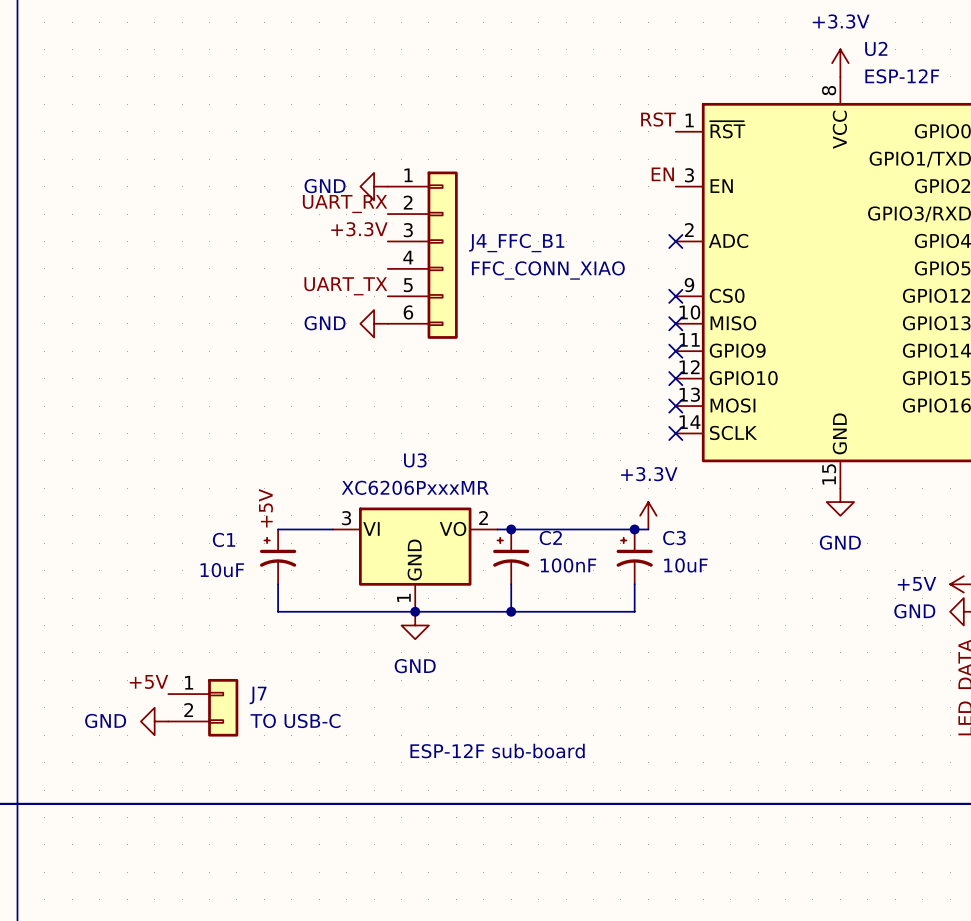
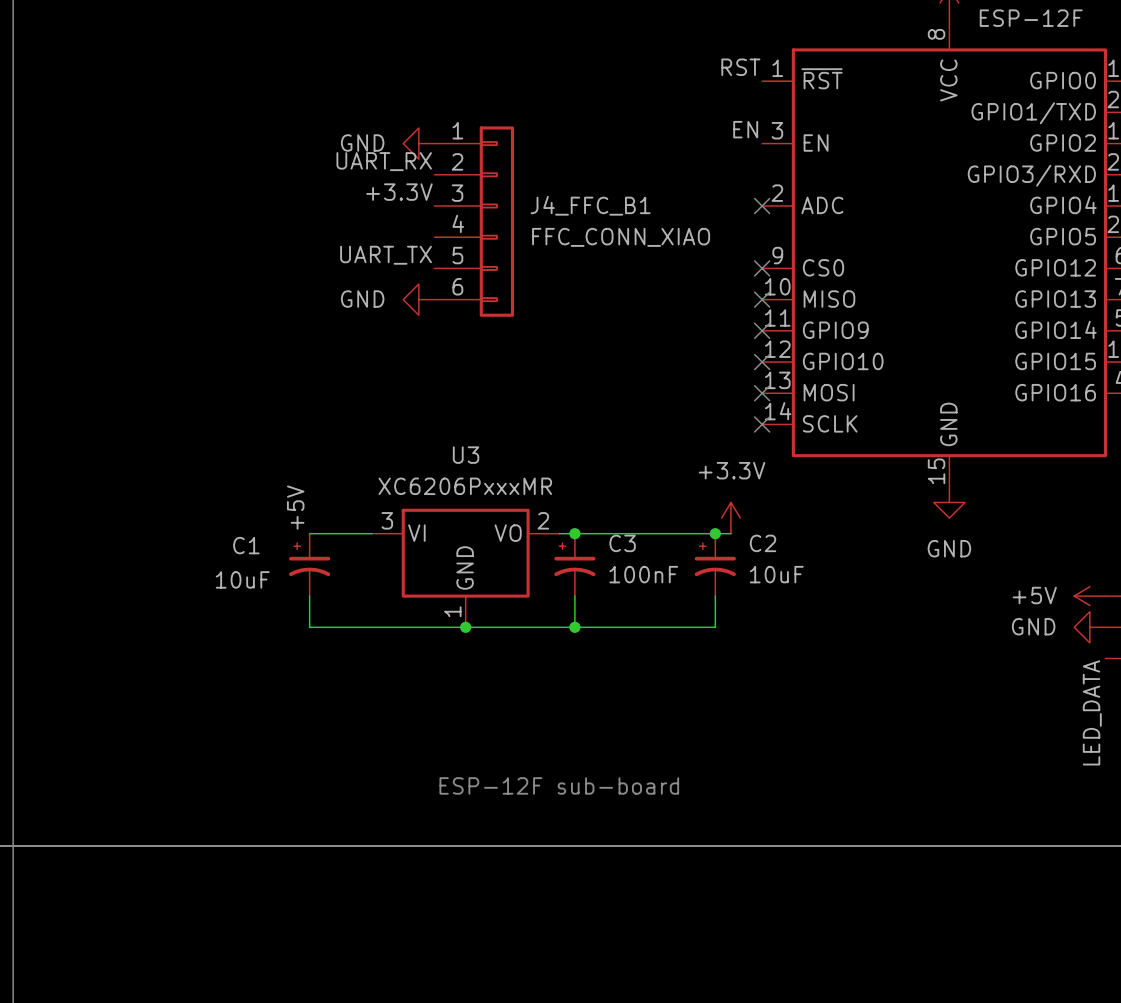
C2 name: C2 (550, 538) -> C3 (622, 543)
C3 name: C3 (674, 538) -> C2 (763, 543)
power symbol: GND (415, 625) -> none
label: +5V (148, 681) -> none
J7: TO USB-C (203, 707) -> none
power symbol: GND (154, 721) -> none

